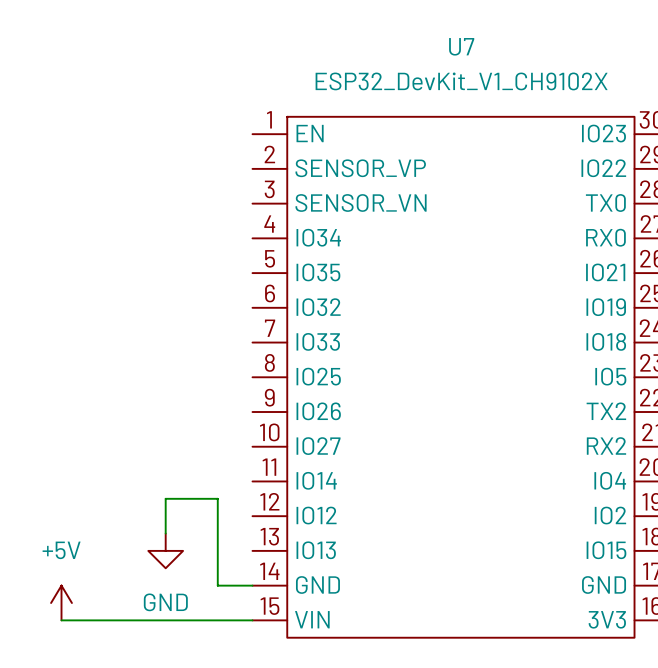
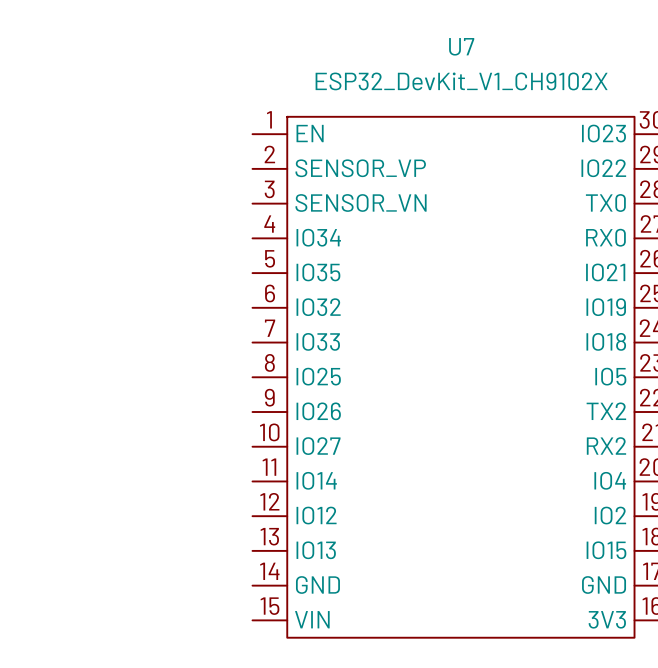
wire: (165, 533) (165, 498) (217, 498) (217, 585) (252, 585) -> none
power symbol: GND (165, 550) -> none
power symbol: +5V (61, 603) -> none
wire: (61, 620) (252, 620) -> none

